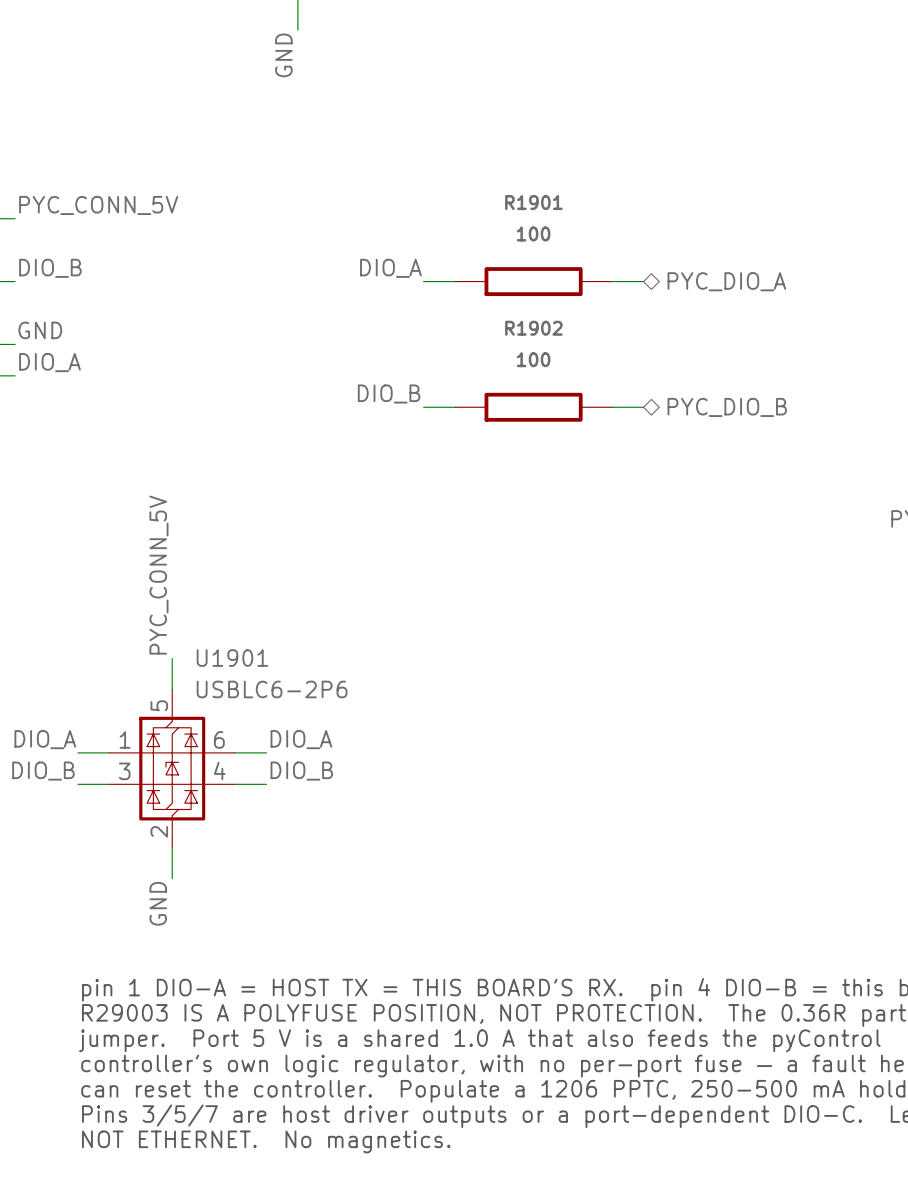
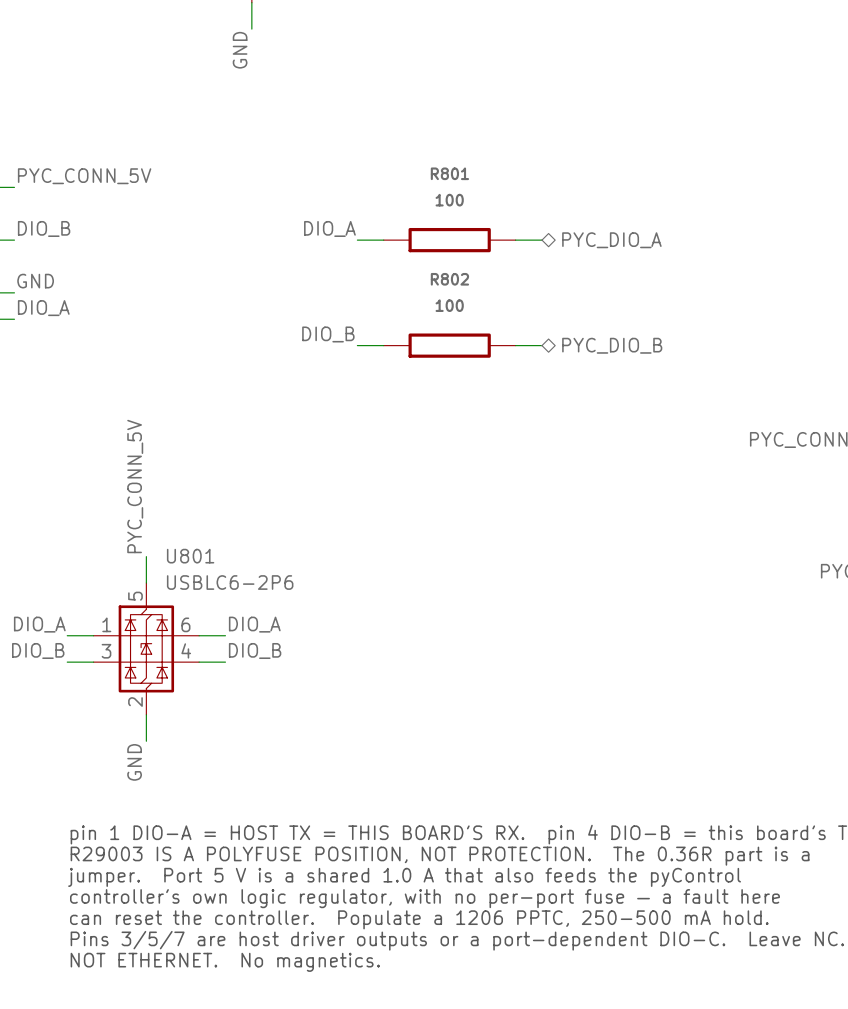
R1901 name: R1901 (533, 202) -> R801 (449, 173)
R1902 name: R1902 (533, 328) -> R802 (449, 279)
U1901 name: U1901 (232, 658) -> U801 (190, 556)

